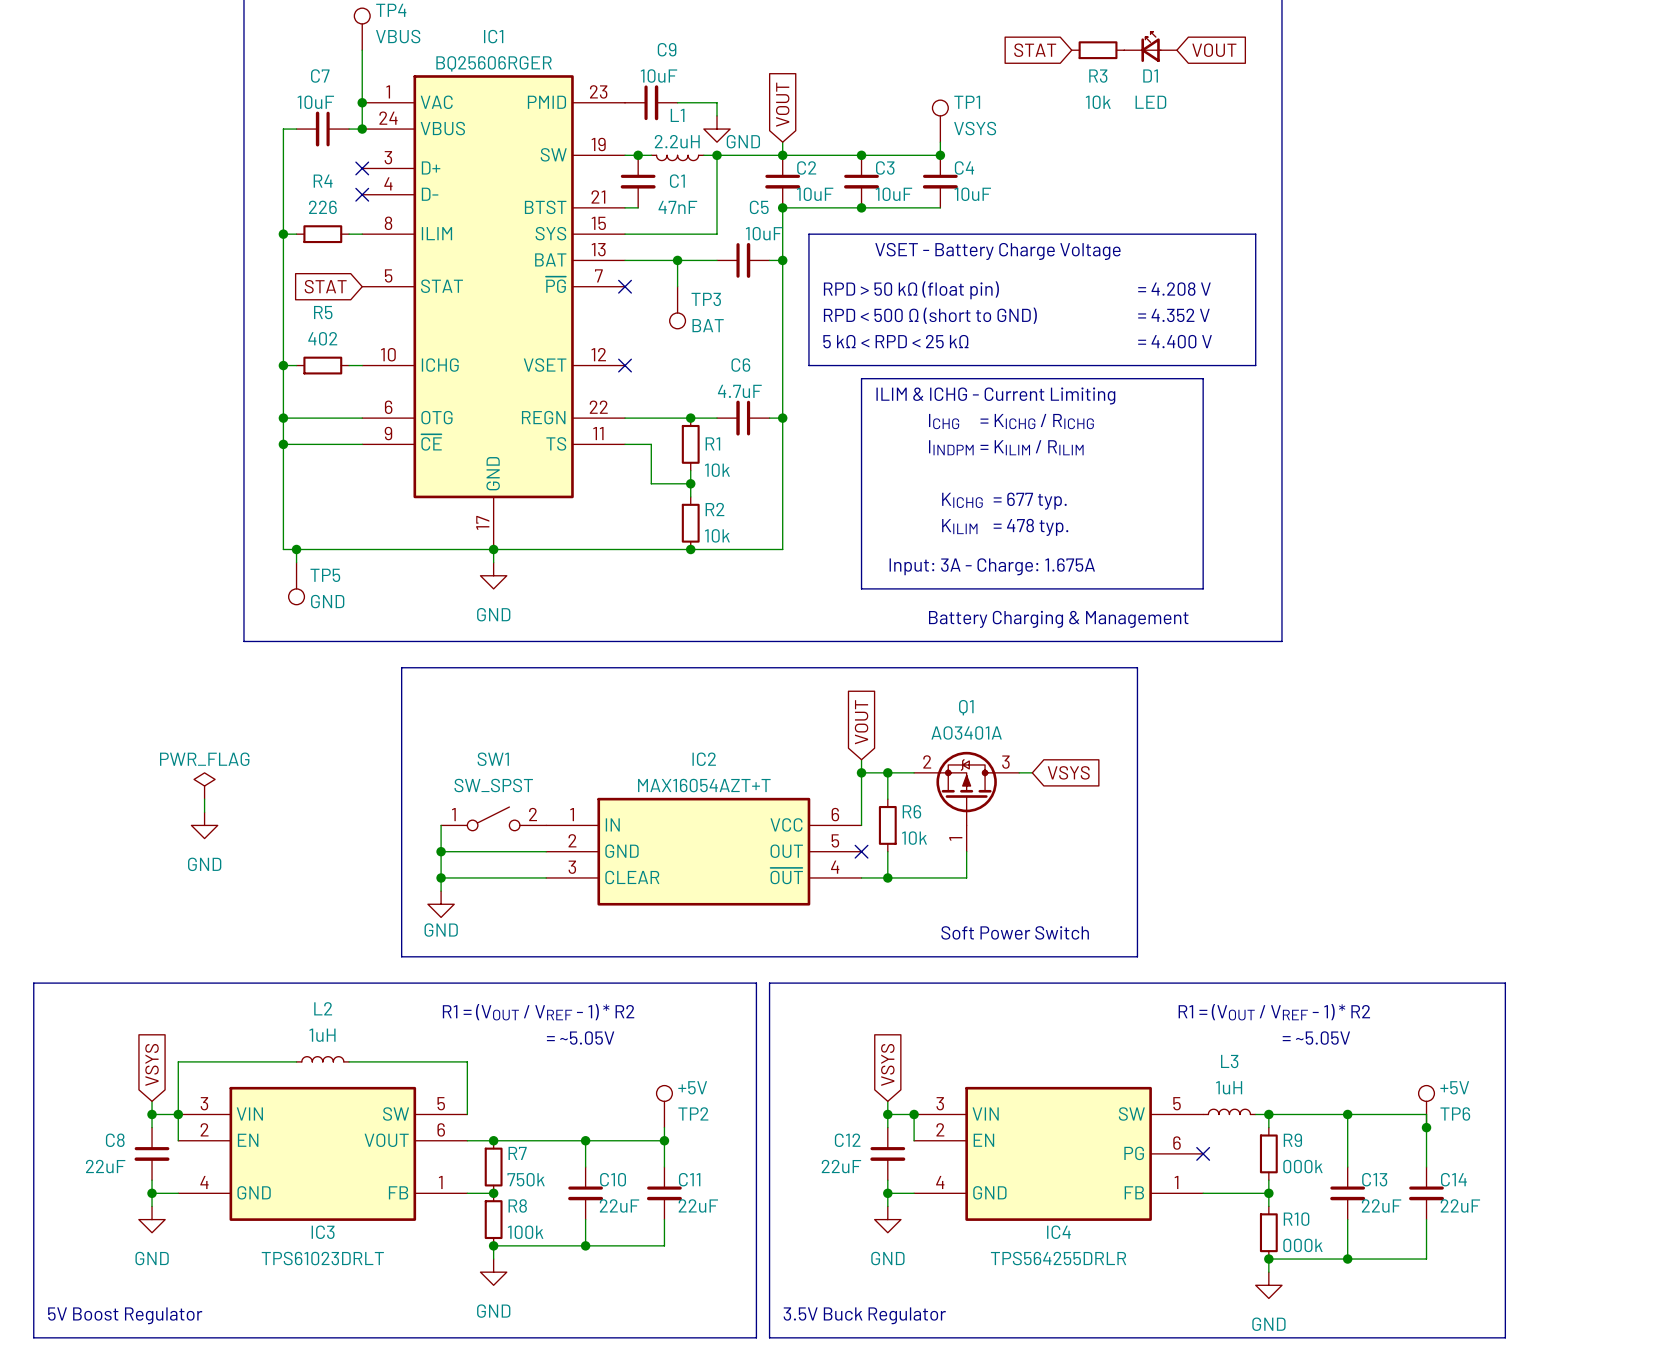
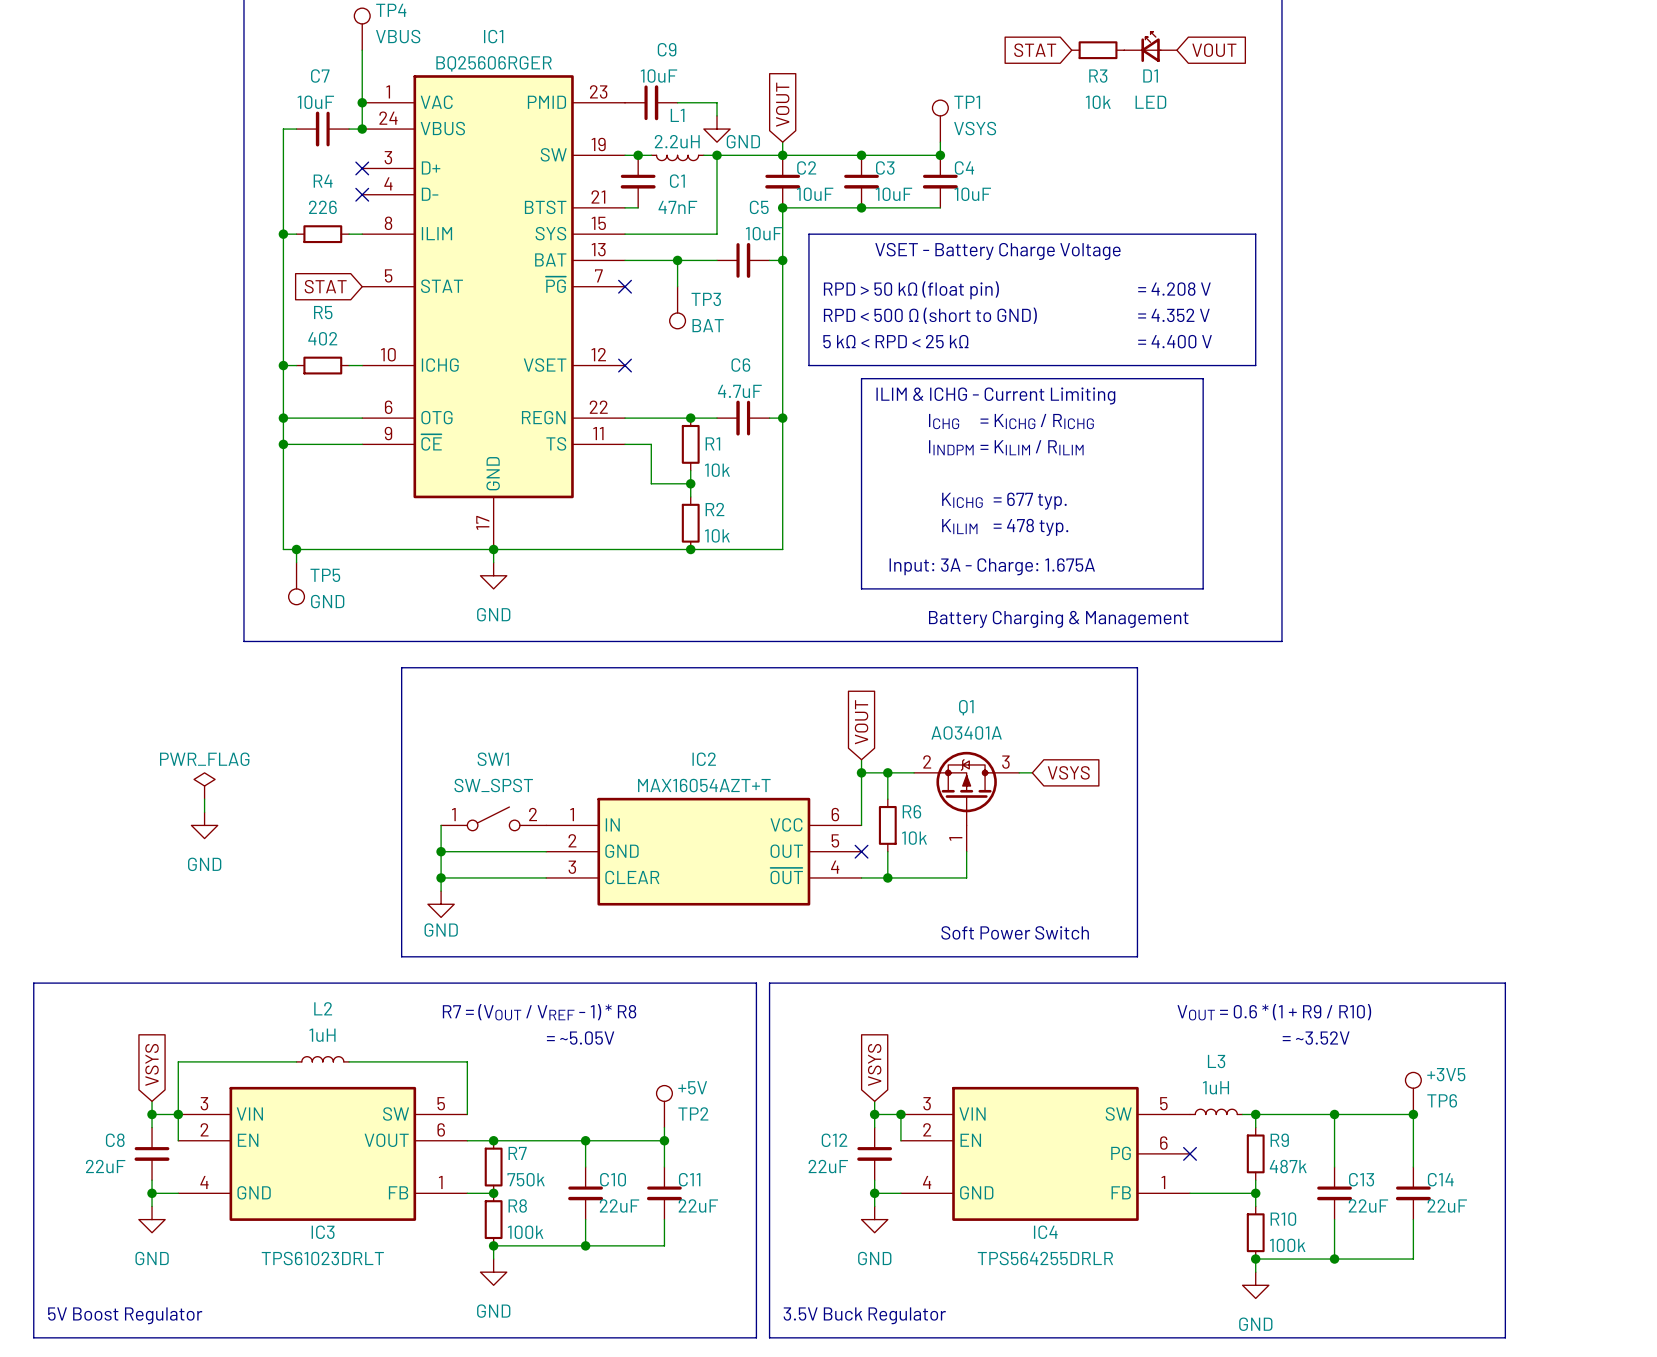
text: R1 = (VOUT / VREF - 1) * R2 (538, 1012) -> R7 = (VOUT / VREF - 1) * R8 (539, 1012)
text: R1 = (VOUT / VREF - 1) * R2 (1274, 1012) -> VOUT = 0.6 * (1 + R9 / R10) (1274, 1012)
text: = ~5.05V (1316, 1038) -> = ~3.52V (1316, 1038)
global label position: VSYS (887, 1064) -> VSYS (874, 1064)
TP6 value: +5V (1454, 1087) -> +3V5 (1446, 1074)
wire: (887, 1101) (887, 1127) -> (874, 1101) (874, 1127)
TP6 position: (1426, 1106) -> (1413, 1093)
L3 position: (1229, 1111) -> (1216, 1111)
wire: none -> (874, 1114) (887, 1114)
junction: none -> (874, 1114)
junction: (887, 1114) -> none
wire: (900, 1114) (914, 1114) (914, 1140) -> (900, 1114) (900, 1140)
junction: none -> (900, 1114)
junction: (914, 1114) -> none
wire: none -> (1242, 1114) (1255, 1114) (1255, 1127)
wire: (1268, 1114) (1268, 1127) -> none
junction position: (1268, 1114) -> (1255, 1114)
wire: (1347, 1114) (1347, 1167) -> (1334, 1114) (1334, 1167)
junction position: (1347, 1114) -> (1334, 1114)
wire: (1413, 1114) (1426, 1114) (1426, 1167) -> (1413, 1114) (1413, 1167)
junction position: (1426, 1127) -> (1413, 1114)
C12 position: (887, 1153) -> (874, 1153)
IC4 position: (1058, 1153) -> (1045, 1153)
no-connect mark position: (1203, 1153) -> (1190, 1153)
R9 position: (1268, 1153) -> (1255, 1153)
R9 value: 000k (1302, 1166) -> 487k (1288, 1166)
wire: (887, 1180) (887, 1206) -> (874, 1180) (874, 1206)
wire: (1268, 1180) (1268, 1206) -> (1255, 1180) (1255, 1206)
junction position: (887, 1193) -> (874, 1193)
junction position: (1268, 1193) -> (1255, 1193)
C13 position: (1347, 1193) -> (1334, 1193)
C14 position: (1426, 1193) -> (1413, 1193)
power symbol position: GND (887, 1219) -> GND (874, 1219)
wire: (1347, 1219) (1347, 1259) -> (1334, 1219) (1334, 1259)
wire: (1426, 1219) (1426, 1259) (1413, 1259) -> (1413, 1219) (1413, 1259)
R10 position: (1268, 1232) -> (1255, 1232)
R10 value: 000k (1302, 1245) -> 100k (1287, 1245)
wire: (1268, 1259) (1268, 1272) -> (1268, 1259) (1255, 1259) (1255, 1272)
junction position: (1268, 1259) -> (1255, 1259)
junction position: (1347, 1259) -> (1334, 1259)
power symbol position: GND (1268, 1285) -> GND (1255, 1285)

